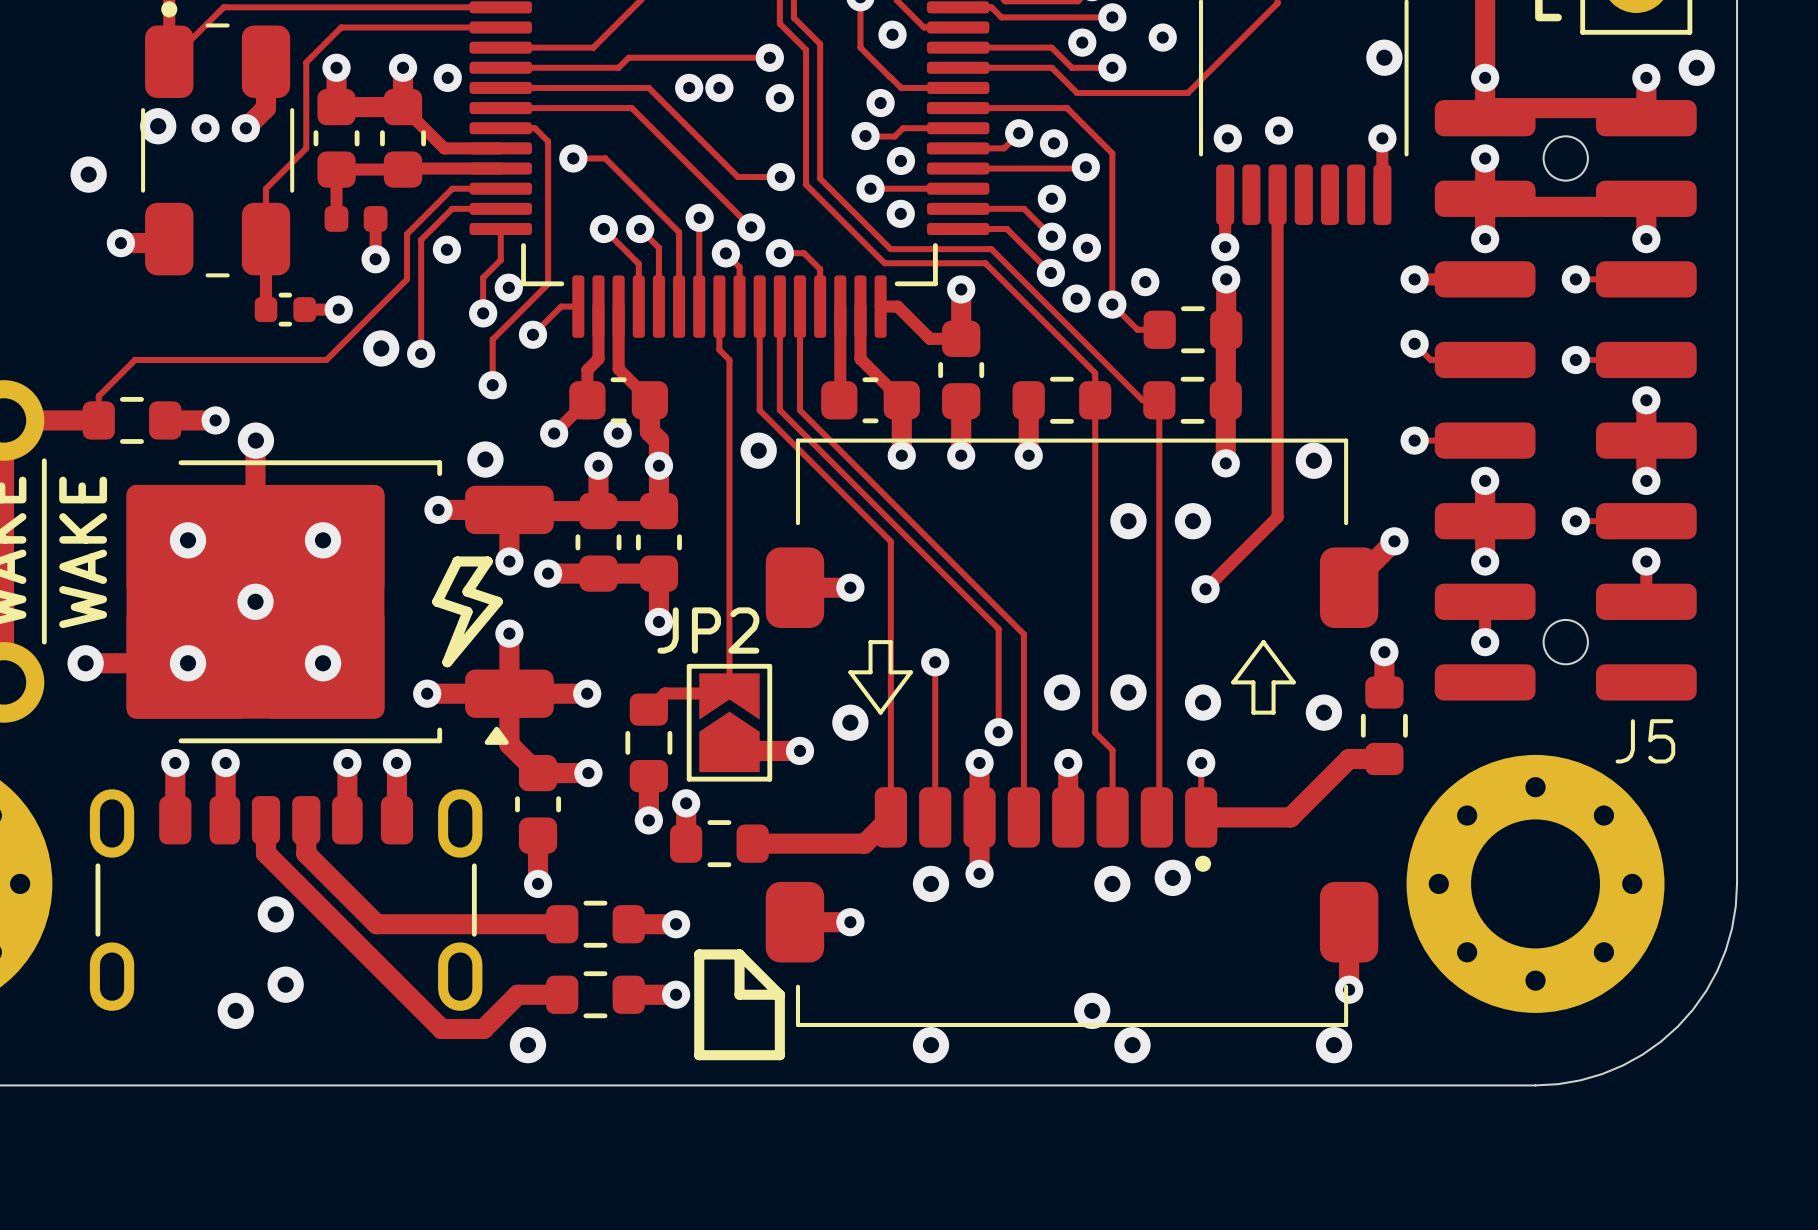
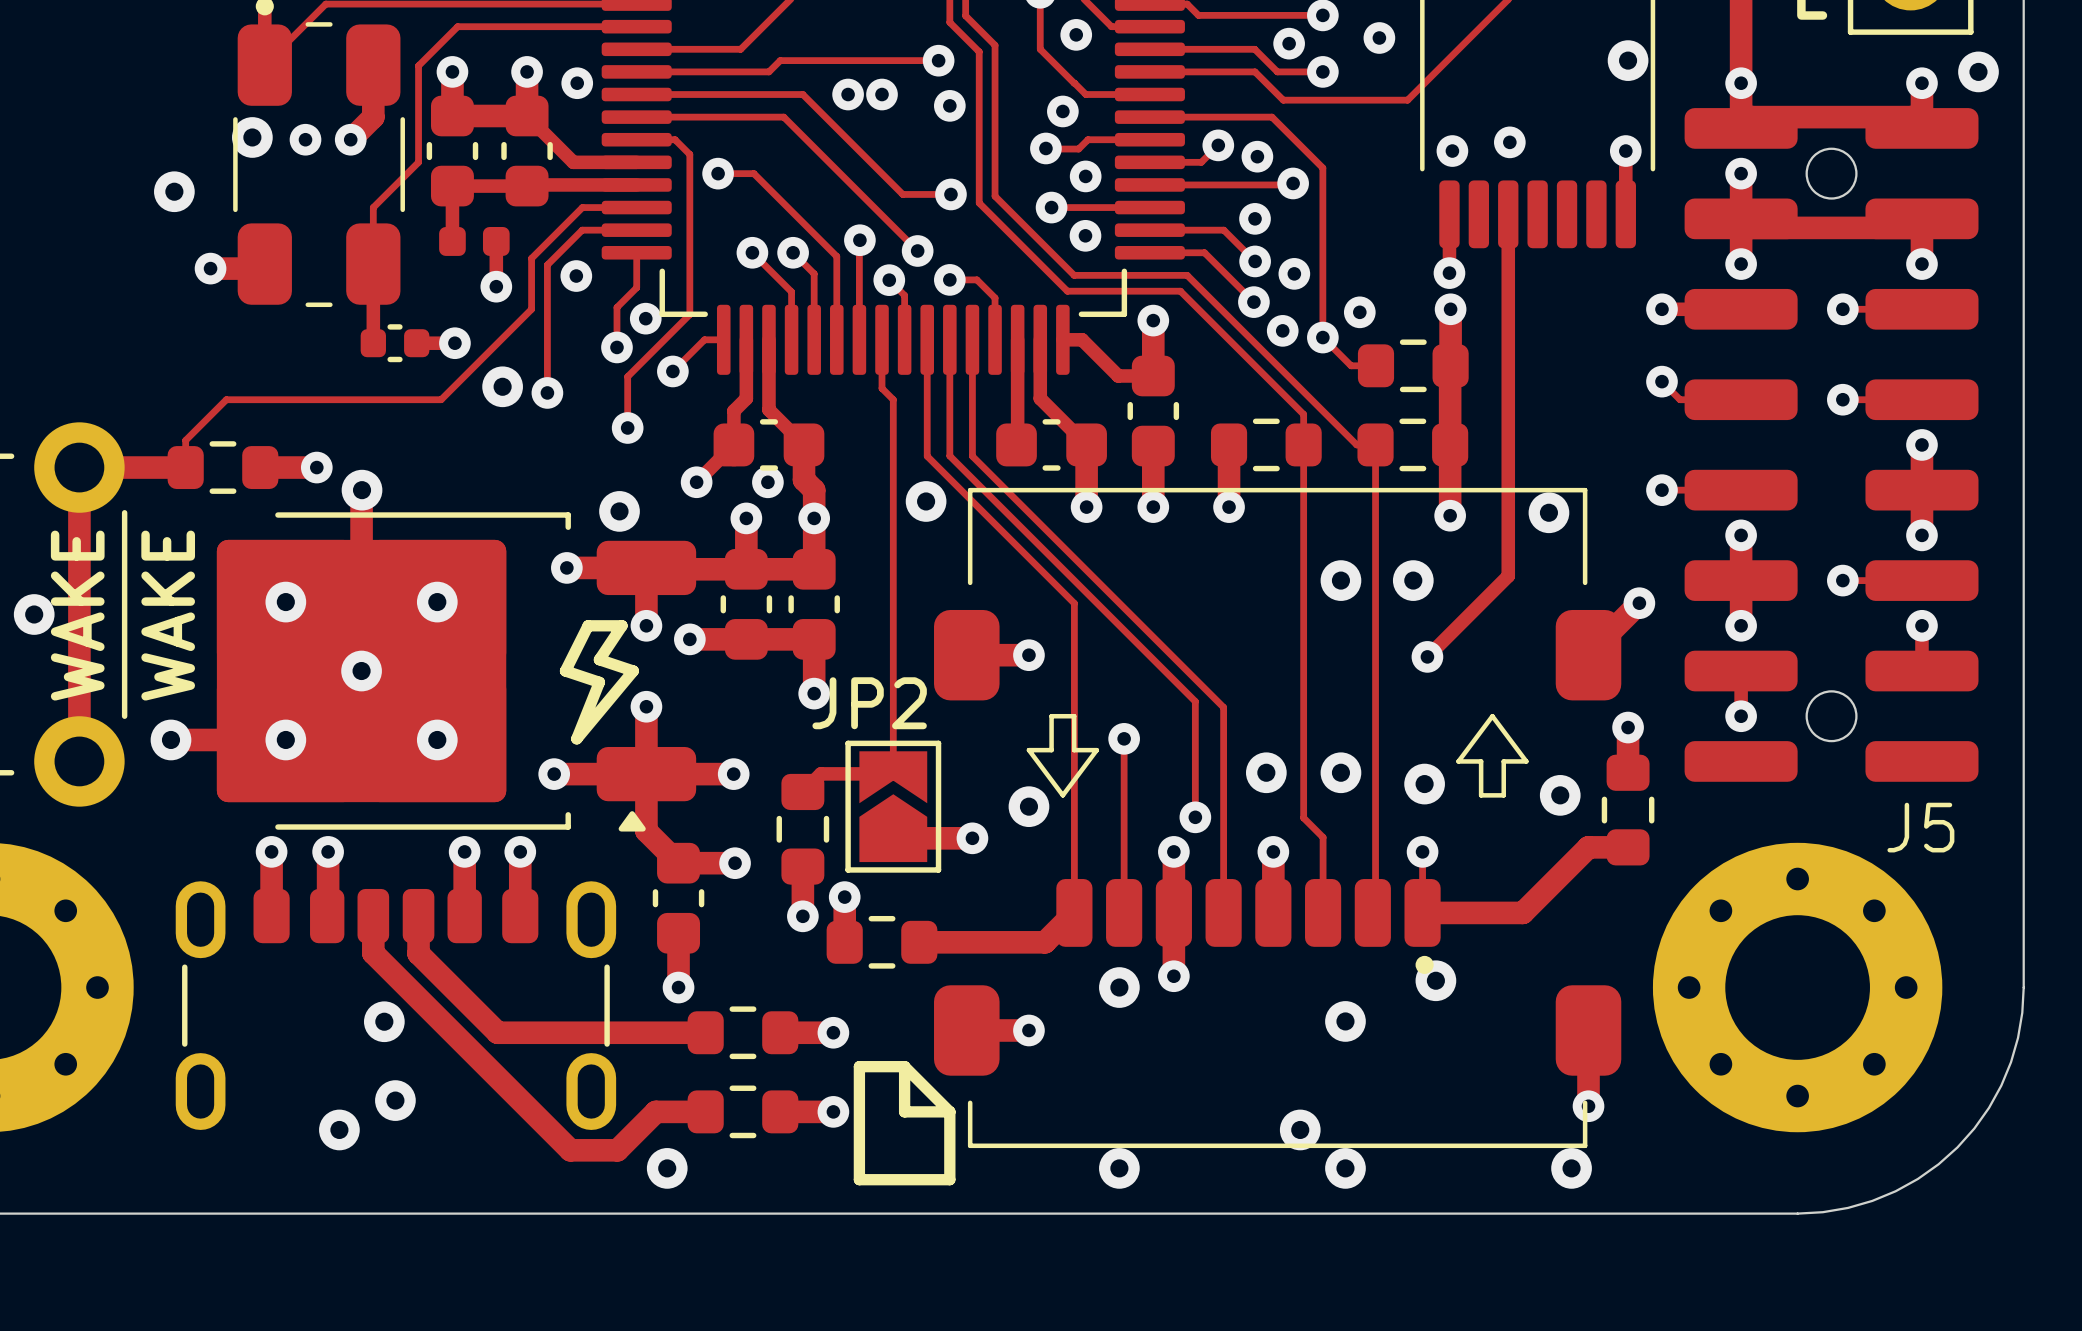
via: (1172, 877) -> none
via: none -> (1435, 980)
via position: (1112, 883) -> (1345, 1021)

